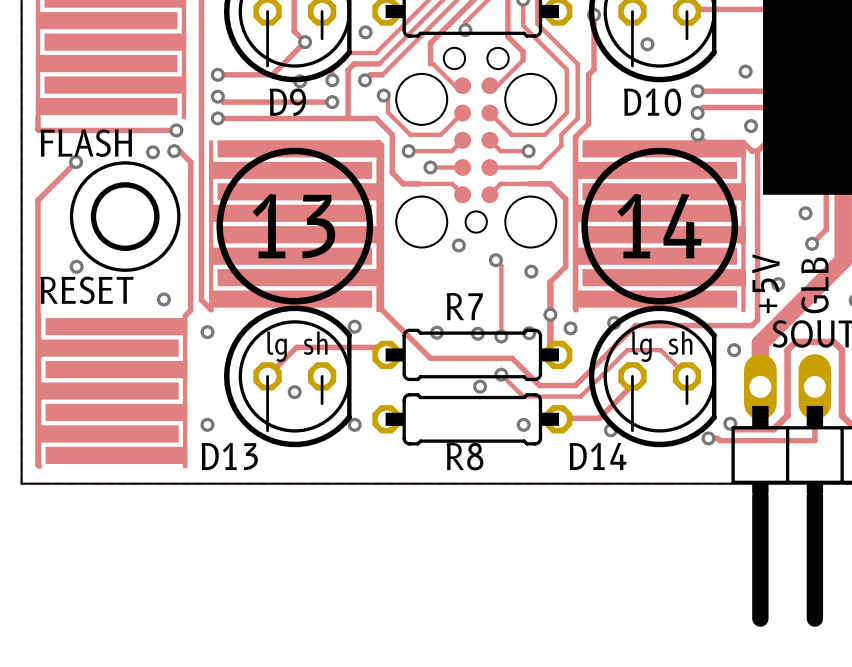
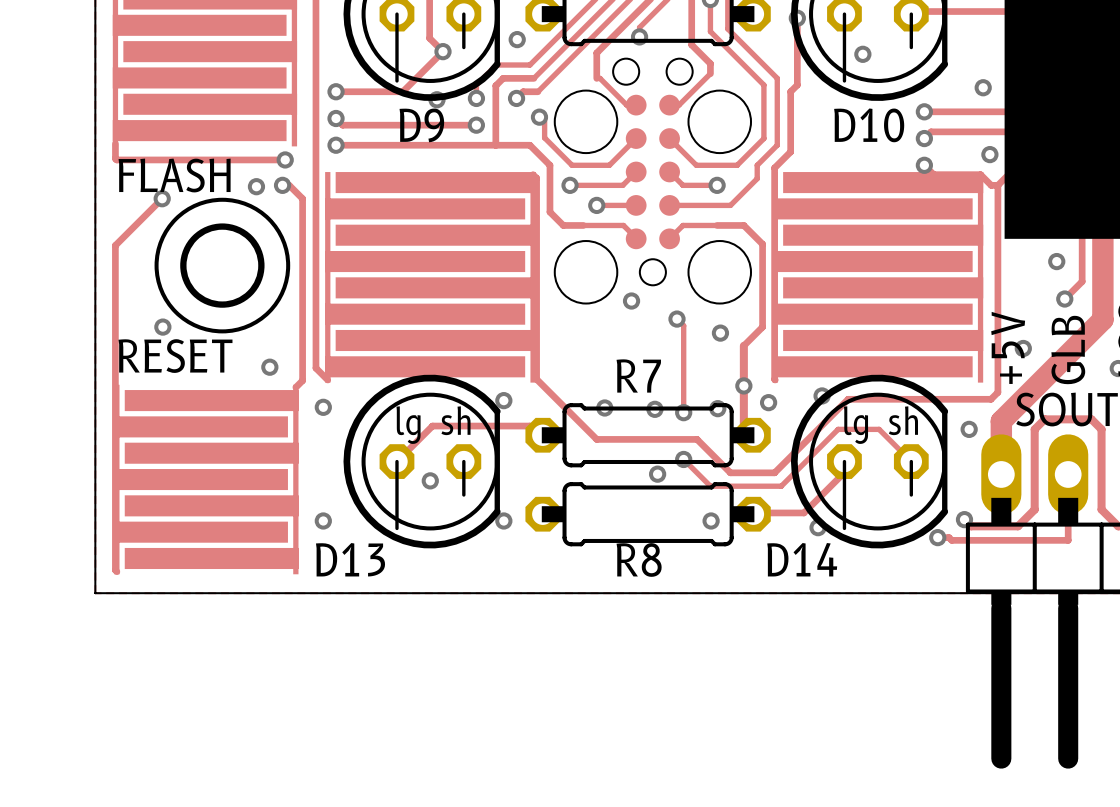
part footprint: [208, 140, 381, 313] -> [325, 172, 536, 383]
part footprint: [573, 140, 746, 313] -> [772, 172, 984, 383]
part value: 13 (293, 226) -> none
part value: 14 (659, 226) -> none

